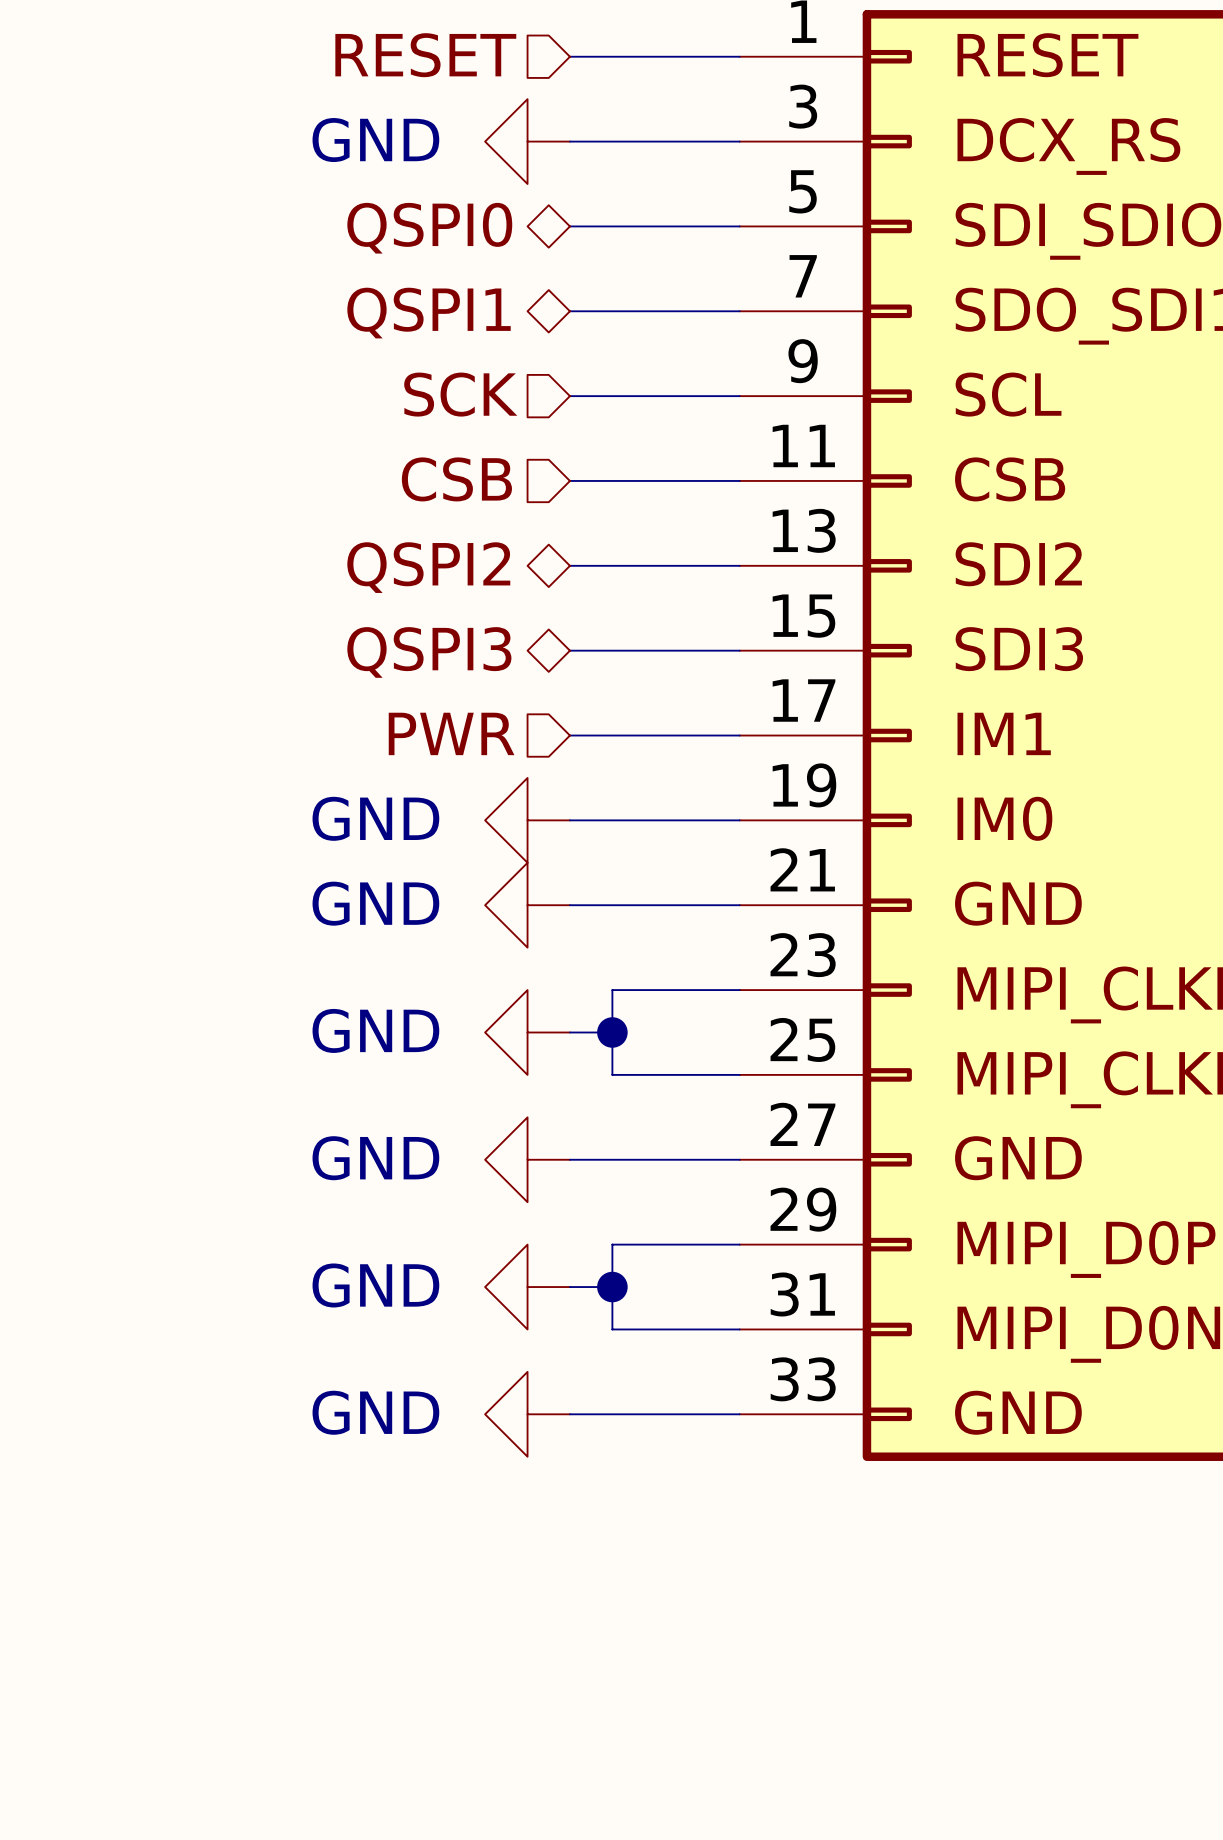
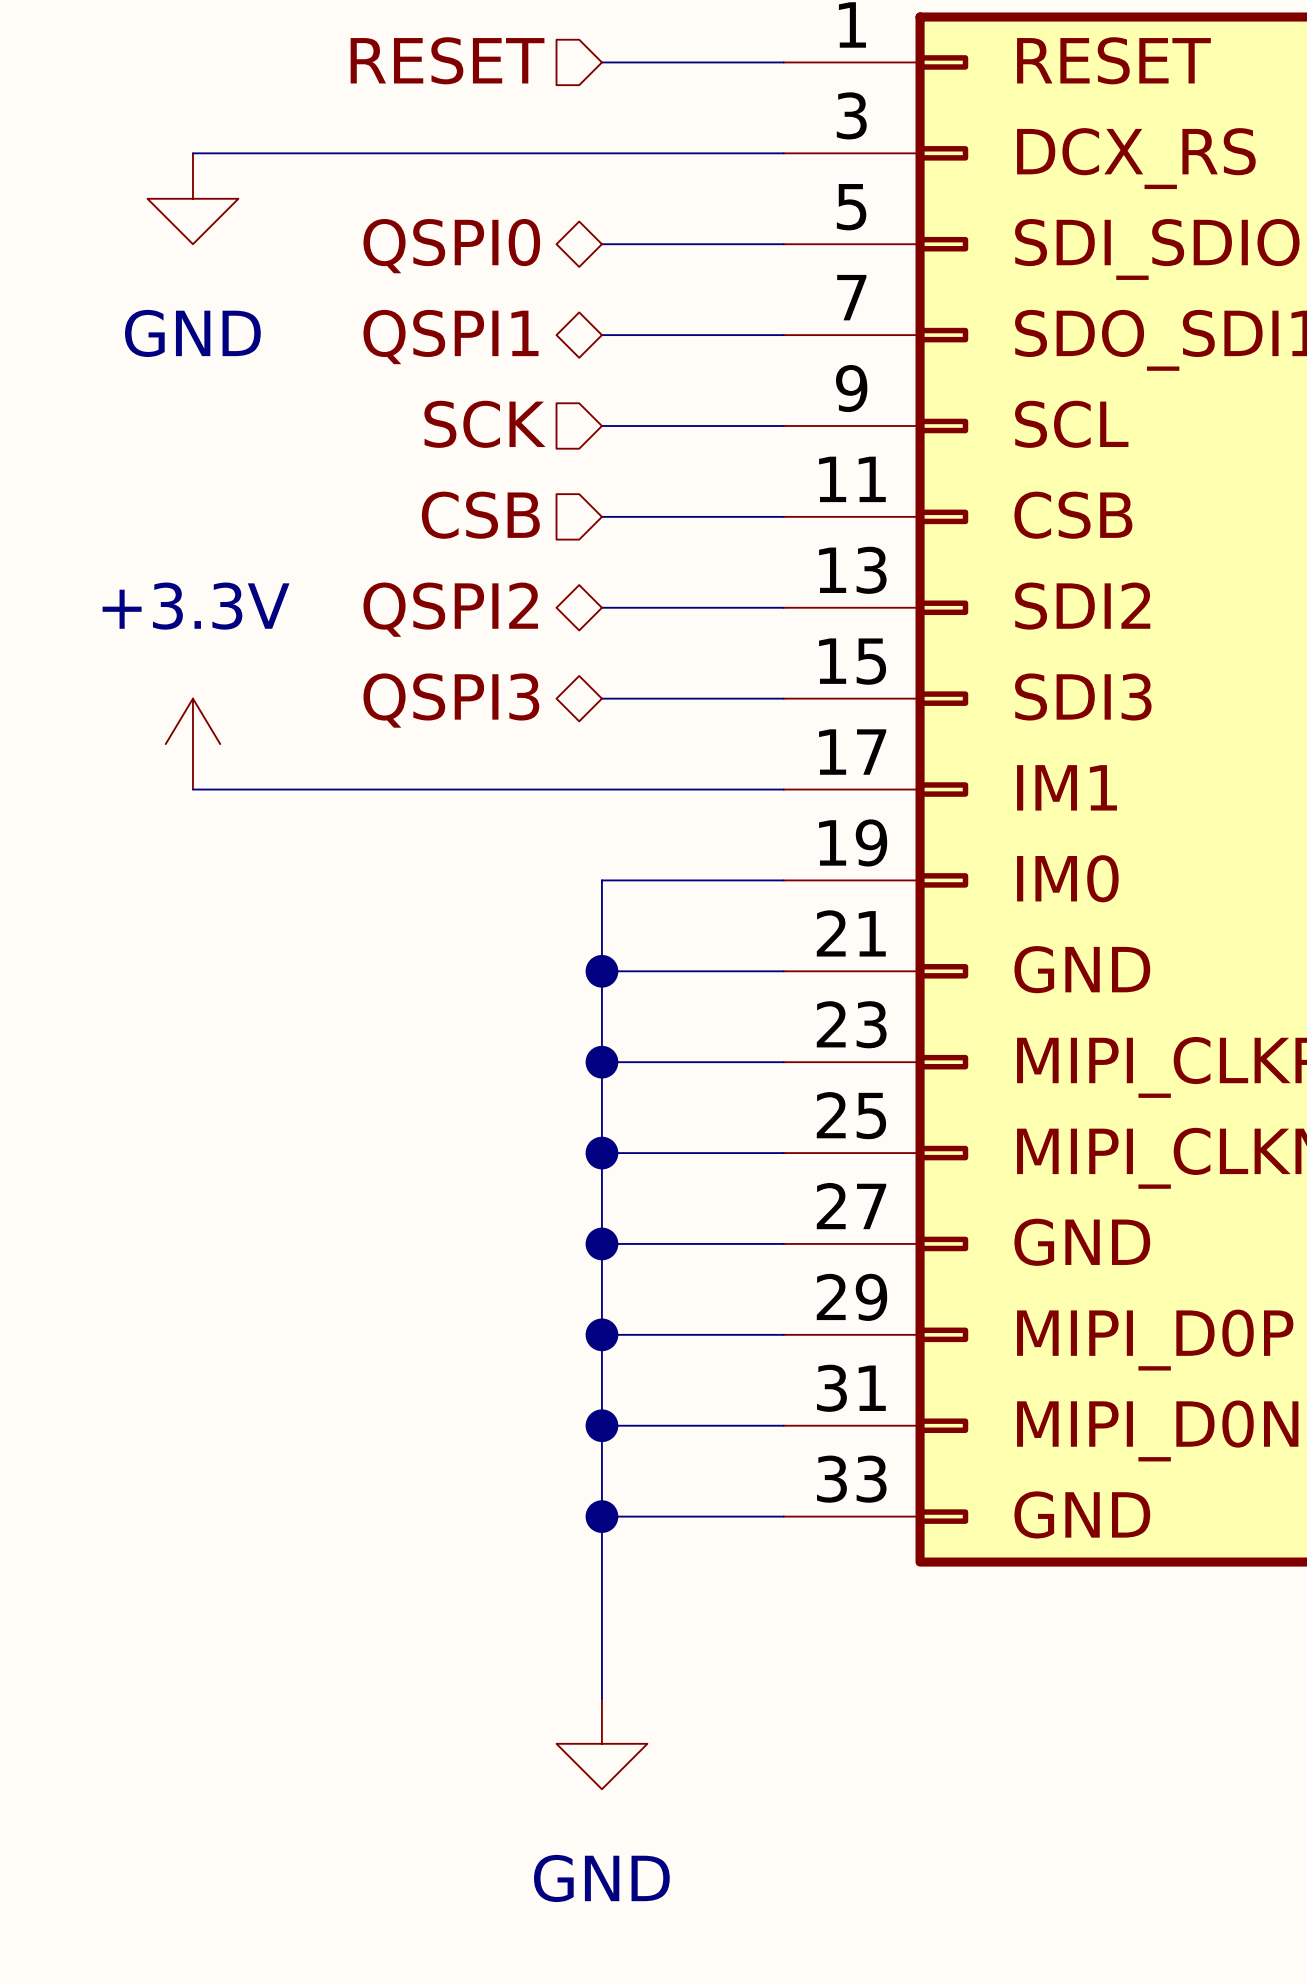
wire: none -> (192, 153) (601, 153)
power symbol rotation: 0° (527, 141) -> 90° counterclockwise (192, 198)
power symbol position: GND (527, 141) -> GND (192, 198)
power symbol: none -> +3.3V (192, 744)
hierarchical label: PWR (451, 733) -> none
wire: none -> (192, 789) (601, 789)
power symbol: GND (527, 820) -> none
wire: none -> (601, 880) (601, 1698)
power symbol: GND (527, 905) -> none
junction: none -> (601, 971)
junction: none -> (601, 1062)
wire: (612, 990) (612, 1074) -> (647, 1062) (601, 1062)
power symbol: GND (527, 1032) -> none
wire: (569, 1032) (612, 1032) -> (601, 1153) (647, 1153)
junction: (612, 1032) -> none
junction: none -> (601, 1153)
power symbol: GND (527, 1159) -> none
junction: none -> (601, 1243)
junction: none -> (601, 1334)
wire: (612, 1244) (612, 1329) -> (647, 1334) (601, 1334)
power symbol: GND (527, 1287) -> none
wire: (569, 1287) (612, 1287) -> (601, 1425) (647, 1425)
junction: (612, 1287) -> none
junction: none -> (601, 1425)
power symbol: GND (527, 1414) -> none
junction: none -> (601, 1516)
power symbol: none -> GND (601, 1743)

